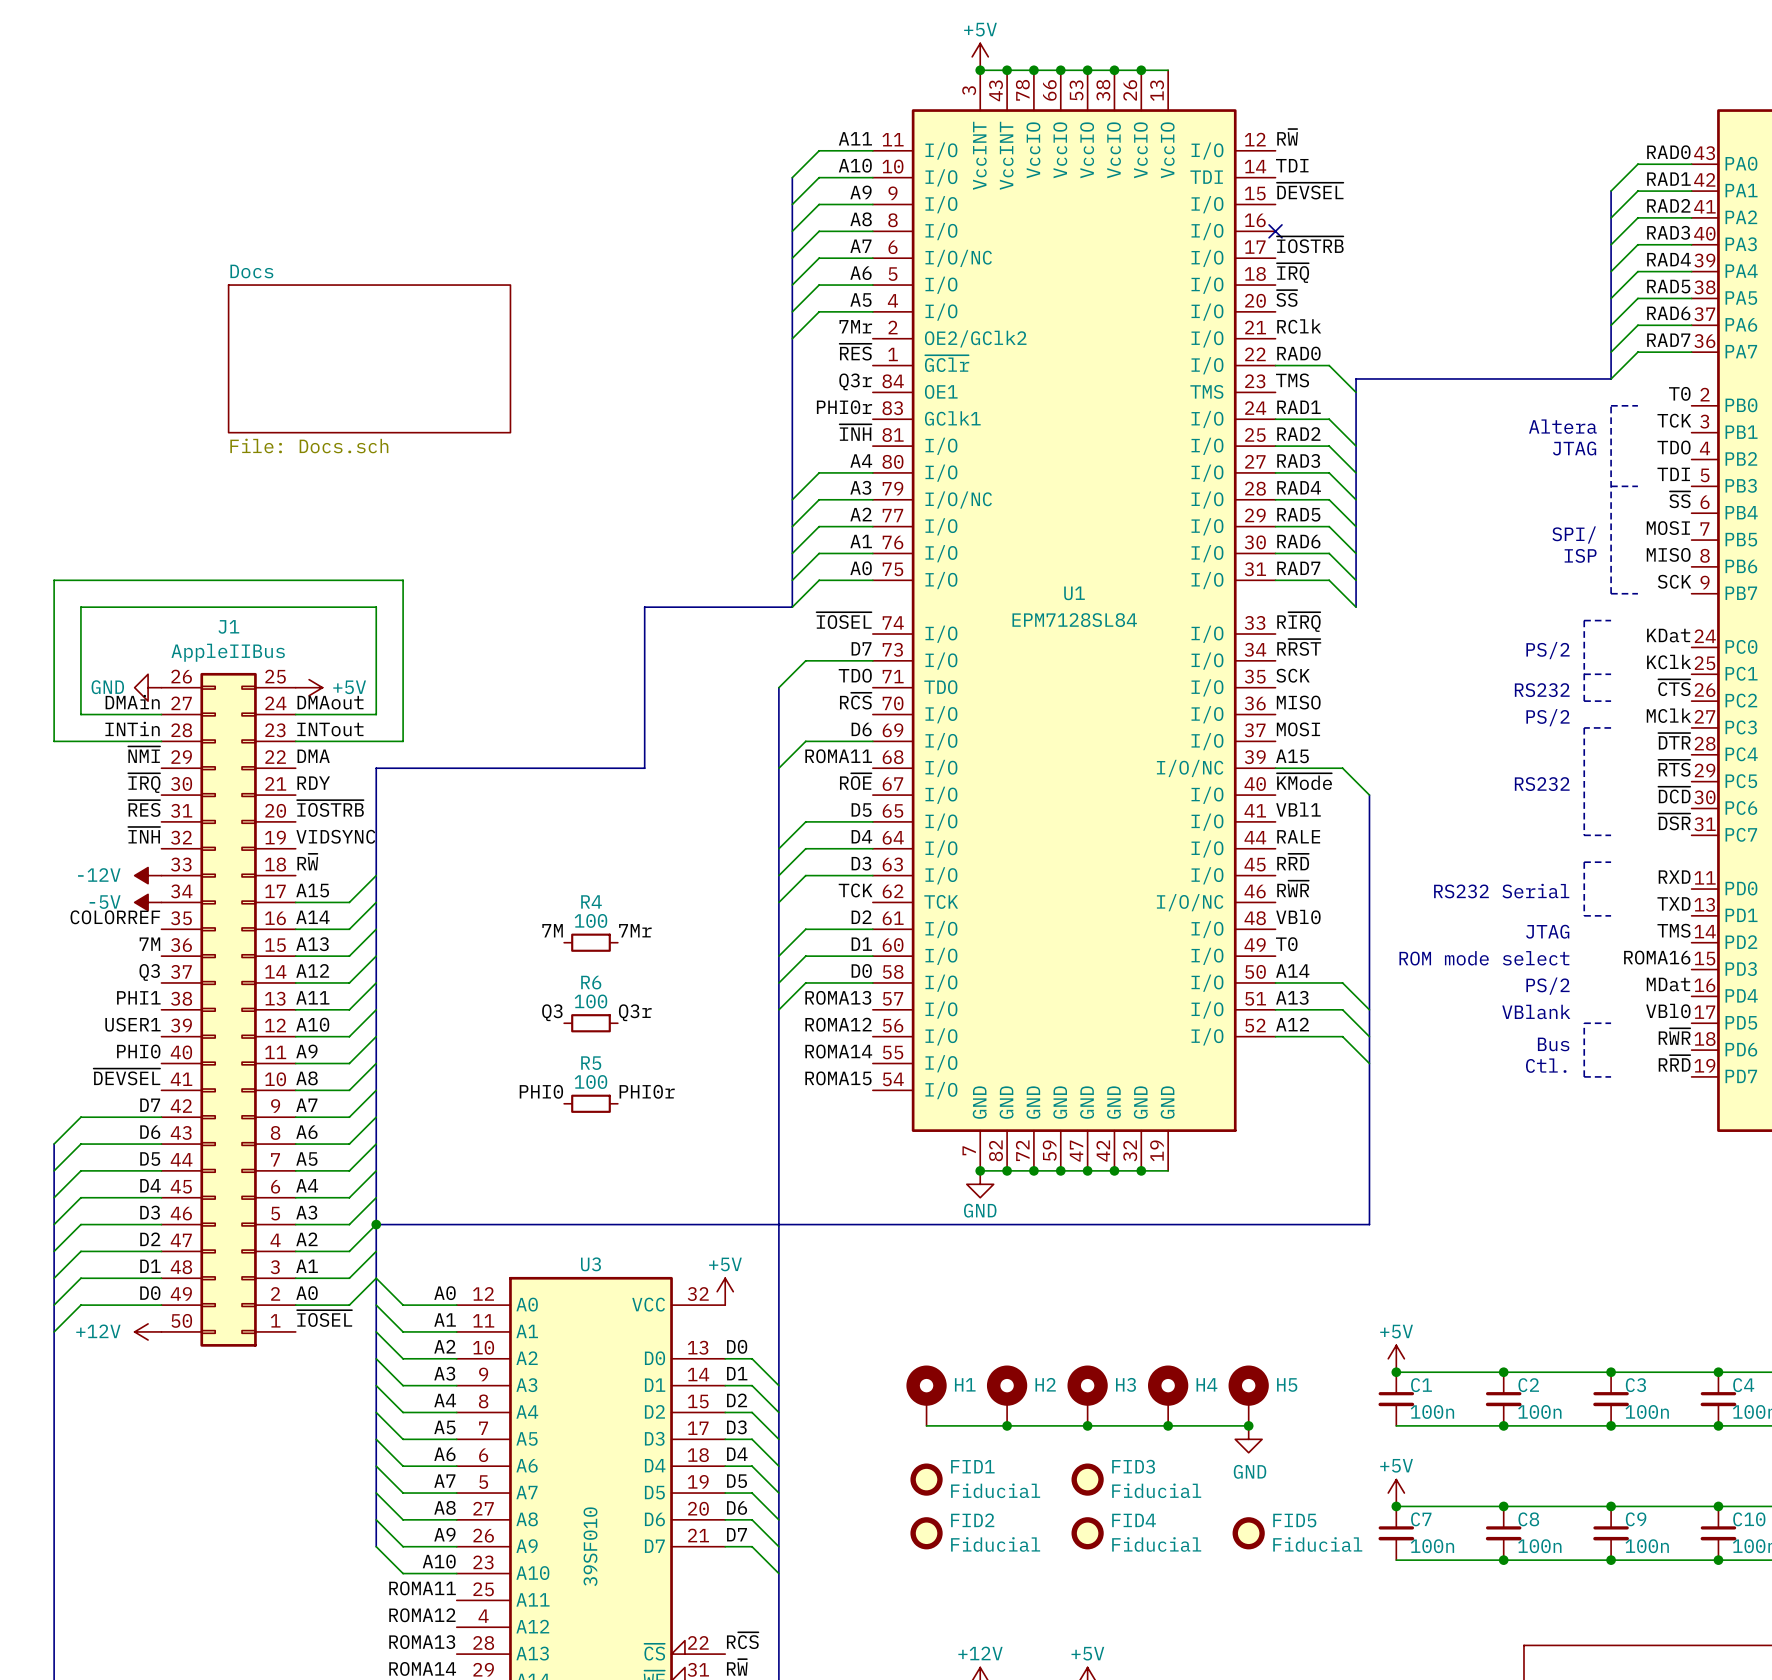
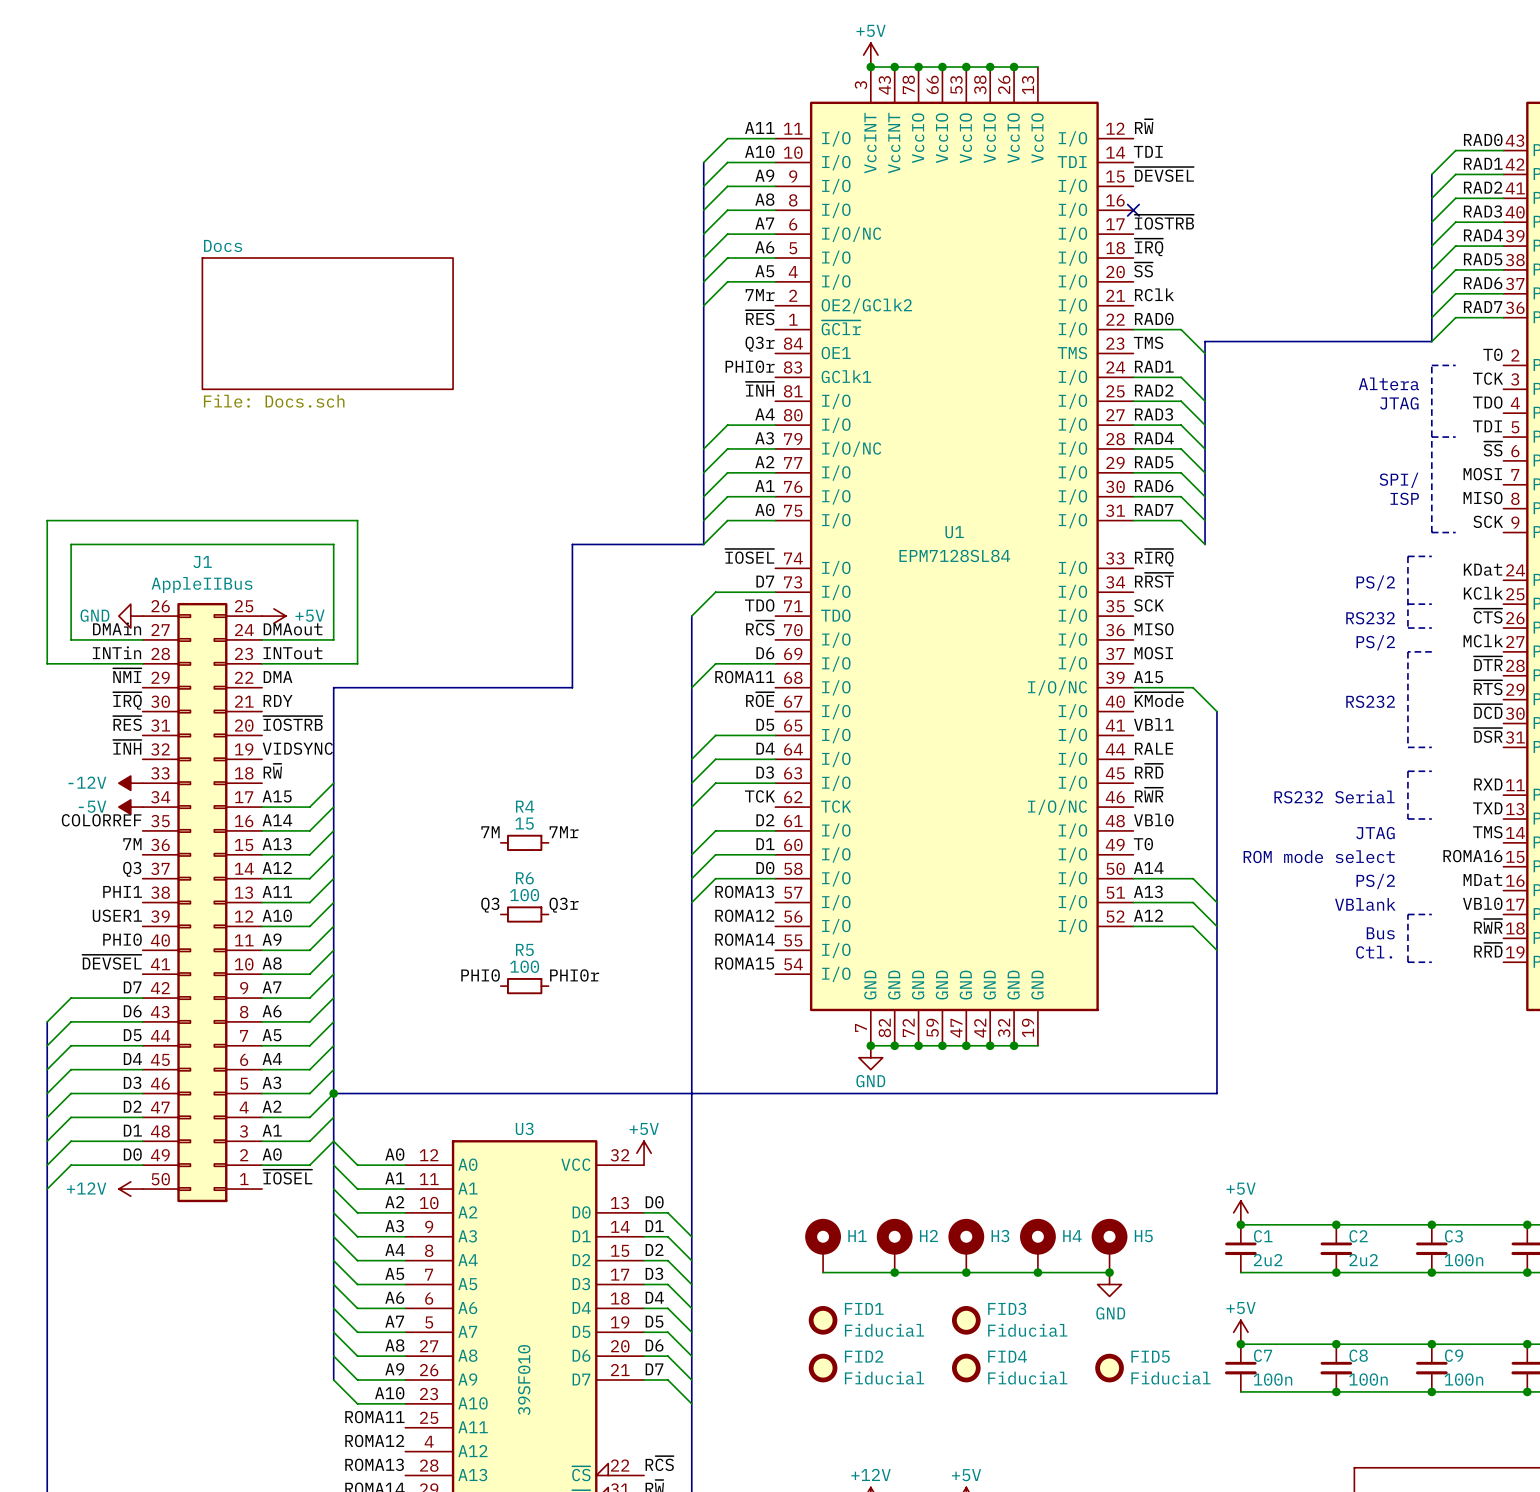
R4 value: 100 (590, 920) -> 15 (524, 823)
C1 value: 100n (1432, 1411) -> 2u2 (1268, 1260)
C2 value: 100n (1539, 1411) -> 2u2 (1363, 1260)

